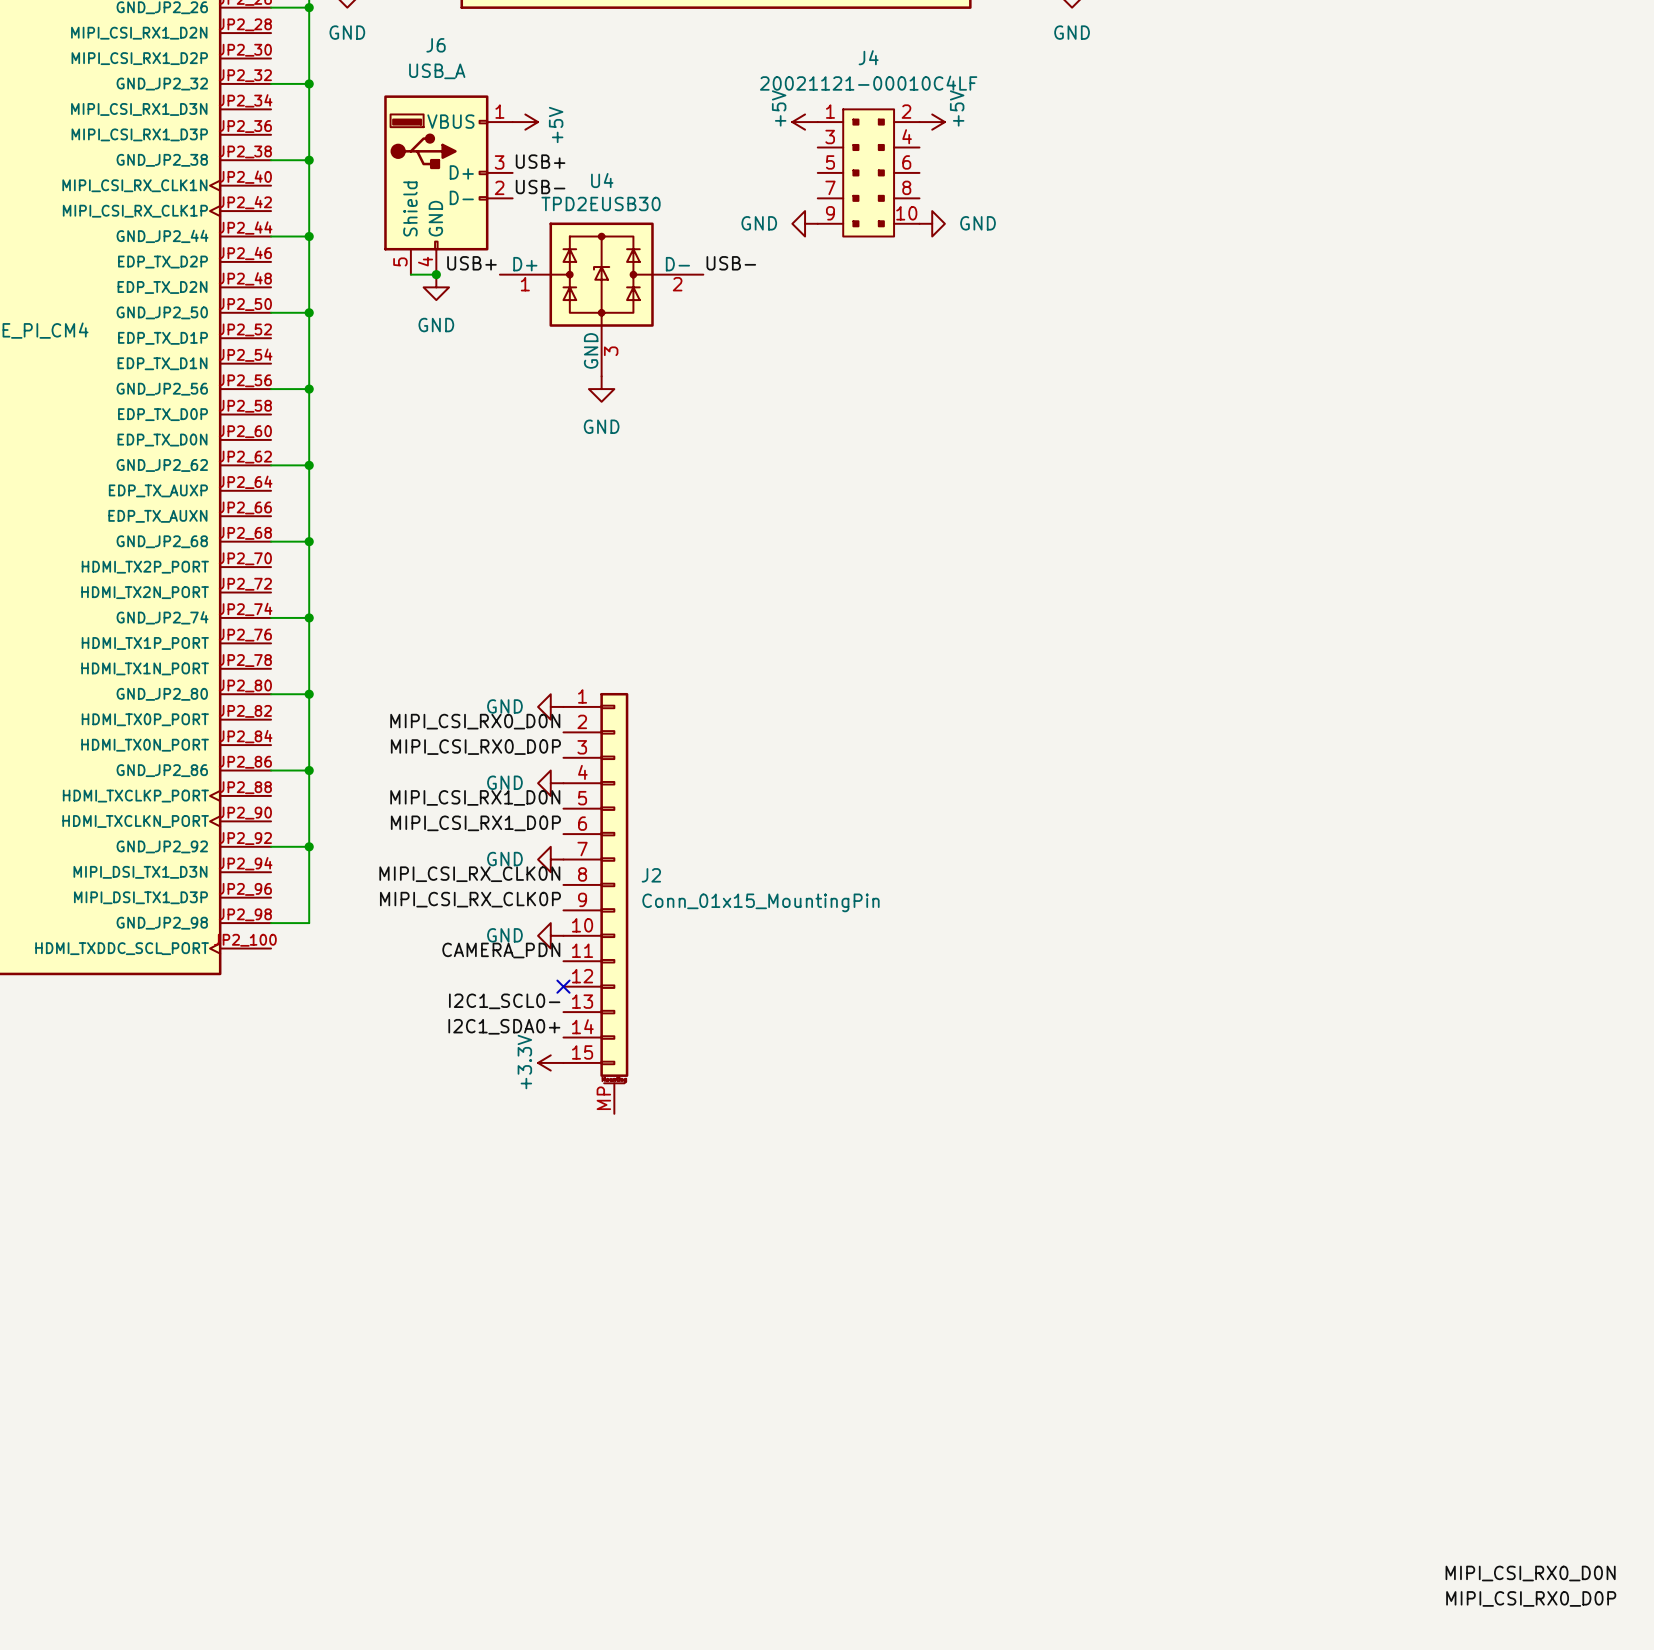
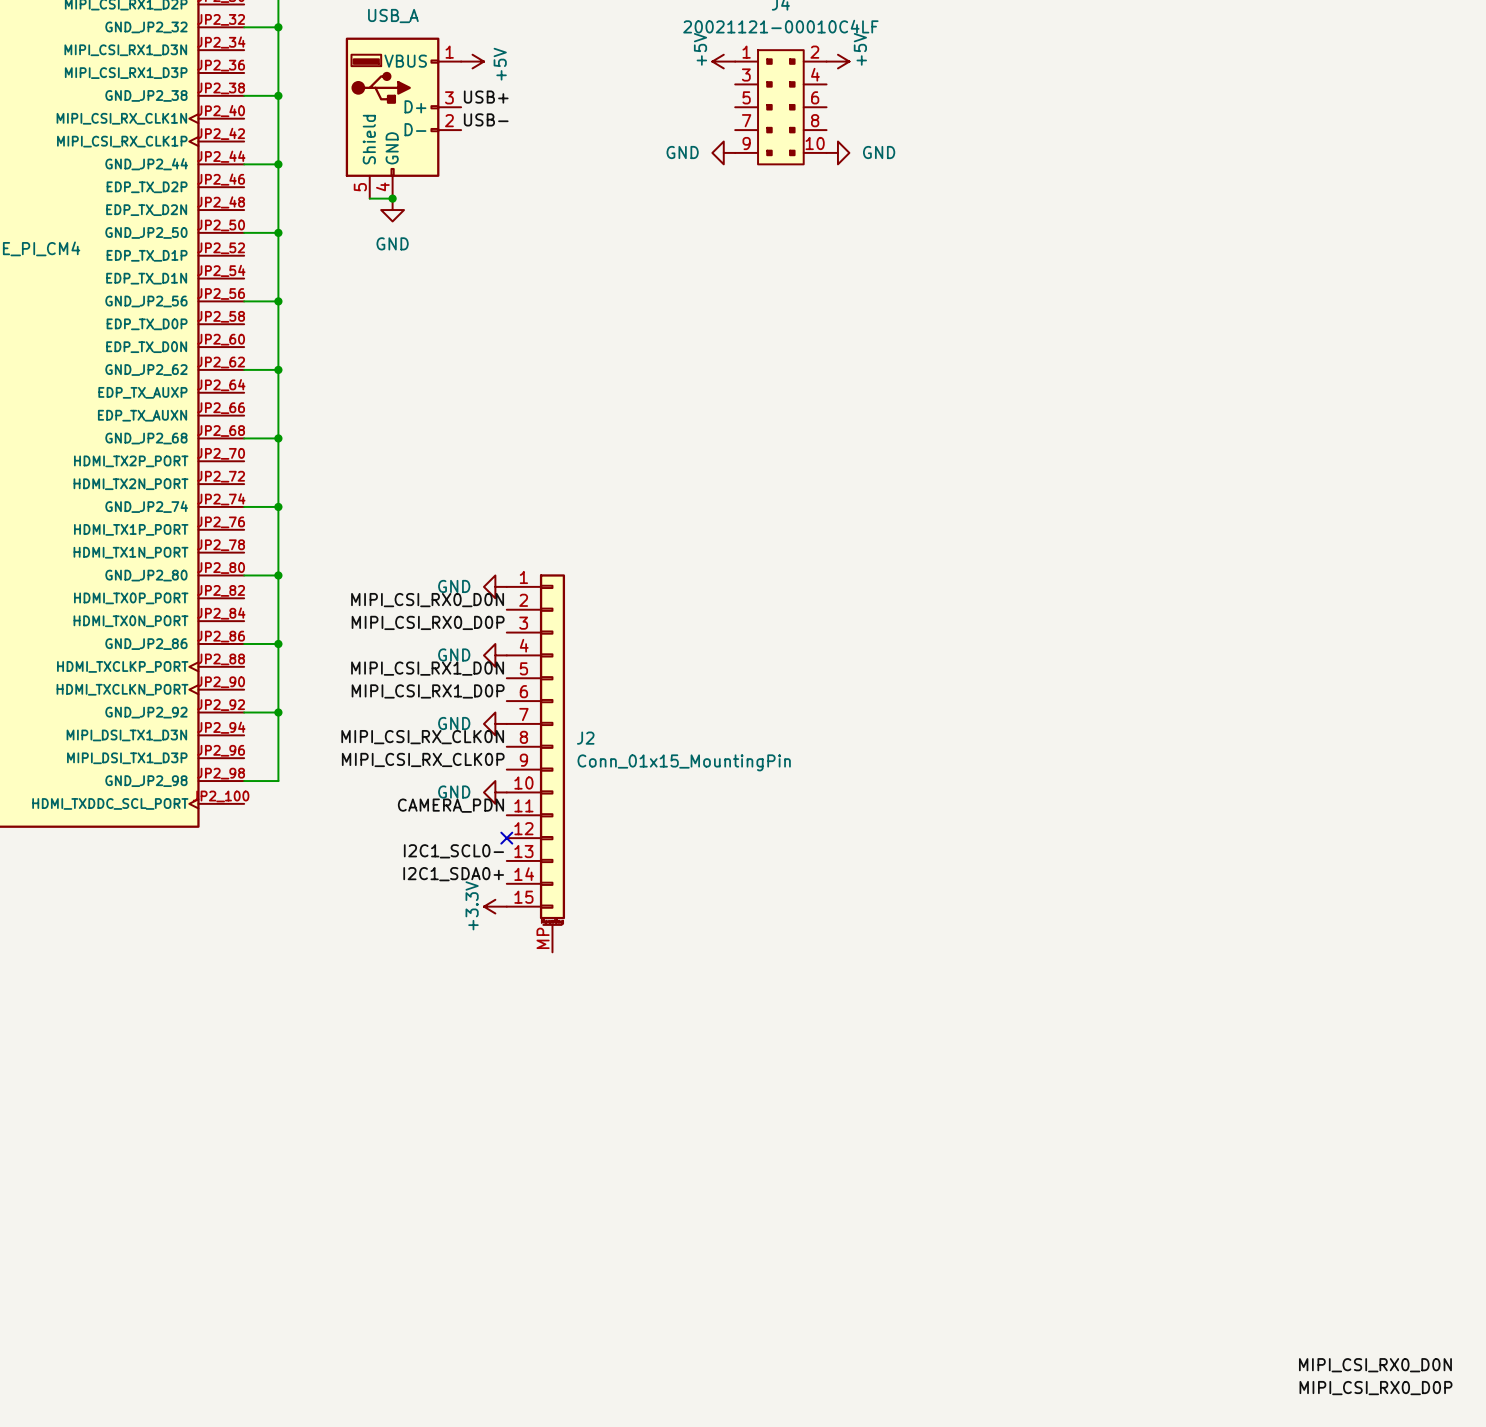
label: USB+ (471, 263) -> none
label: USB- (731, 263) -> none
U4: TPD2EUSB30 (601, 299) -> none
power symbol: GND (601, 389) -> none

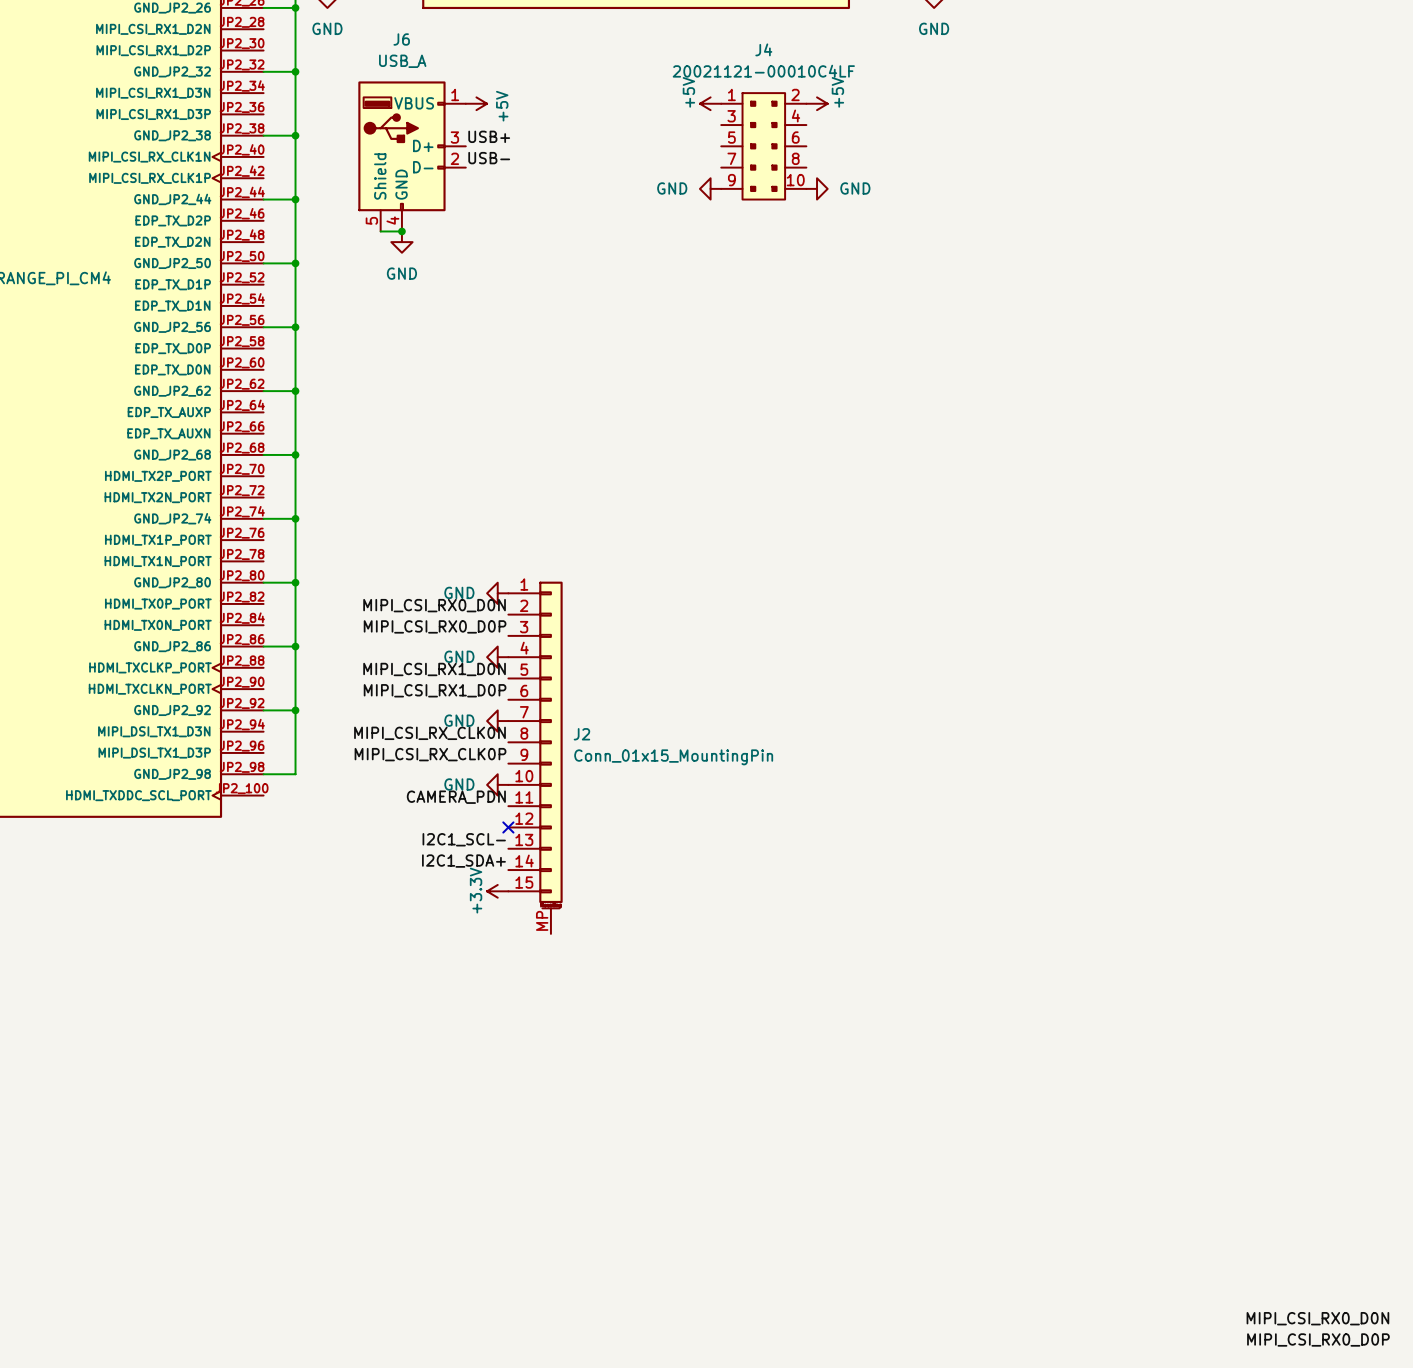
label: I2C1_SCL0- (453, 851) -> I2C1_SCL- (464, 839)
label: I2C1_SDA0+ (453, 874) -> I2C1_SDA+ (463, 861)

